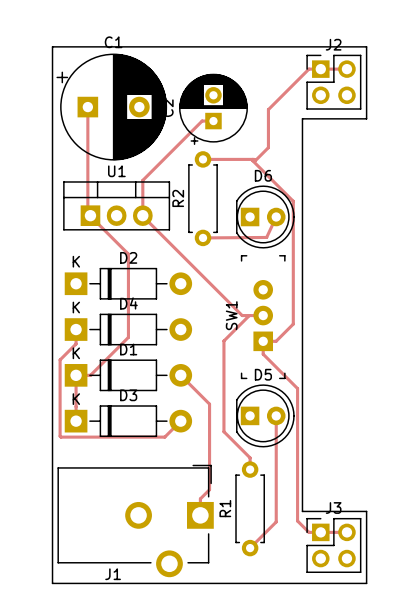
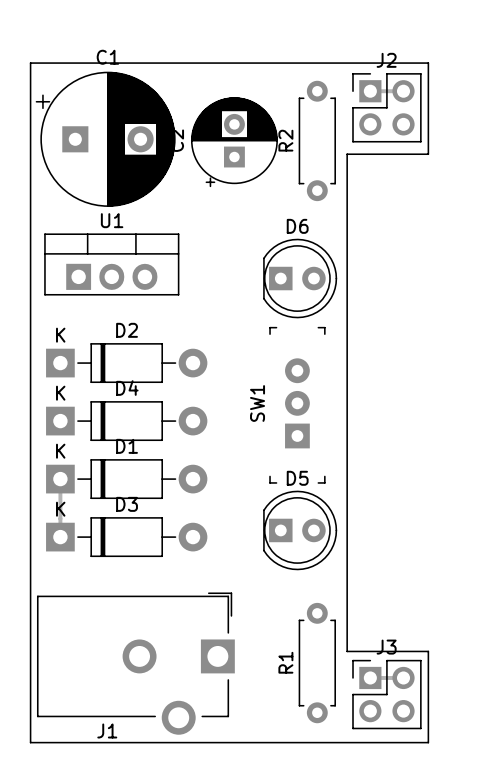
track: (320, 69) (308, 69) (268, 109) (268, 147) (255, 160) (203, 159) -> none
track: (87, 107) (87, 213) (128, 254) (128, 337) (90, 375) (76, 375) -> none
track: (213, 121) (202, 121) (142, 180) (142, 216) (242, 315) (263, 315) -> none
track: (252, 159) (293, 201) (293, 324) (276, 341) (263, 341) (263, 354) (297, 388) (297, 521) (308, 532) (320, 532) -> none
R2 position: (203, 198) -> (317, 140)
track: (276, 216) (266, 237) (203, 237) -> none
track: (249, 315) (223, 340) (223, 431) (250, 457) (250, 469) -> none
track: (76, 329) (76, 343) (60, 359) (61, 437) (164, 437) (180, 421) -> none
track: (180, 375) (209, 404) (209, 489) (200, 498) (200, 515) -> none
track: (276, 415) (276, 521) (250, 548) -> none
R1 position: (250, 508) -> (317, 663)

